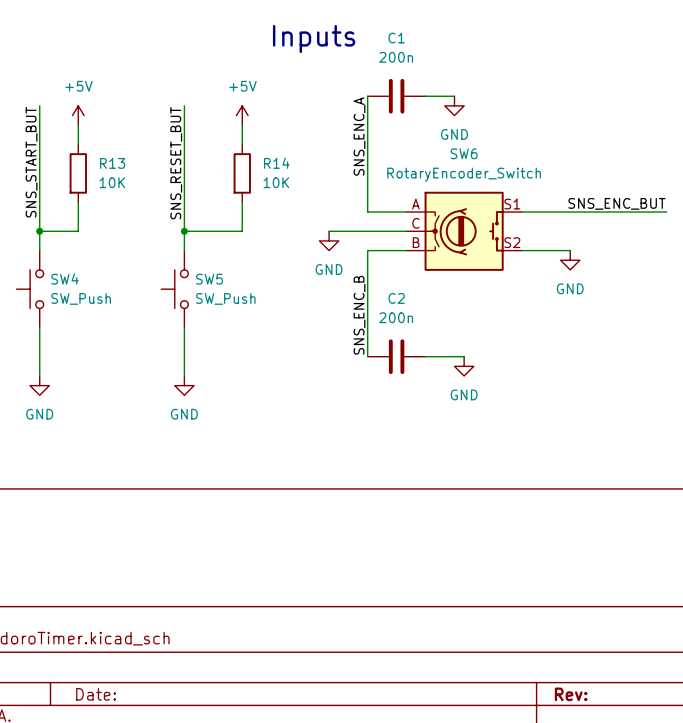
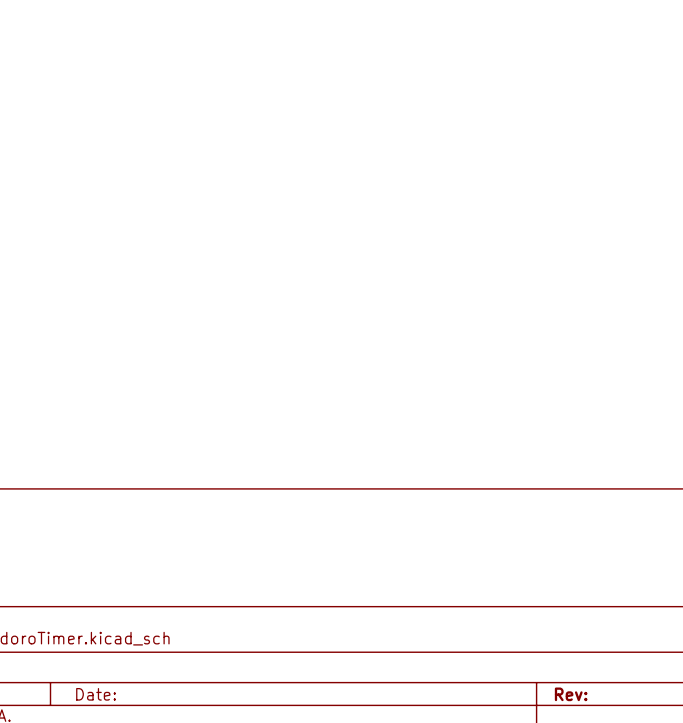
text: Inputs (314, 38) -> none
wire: (367, 96) (367, 212) (406, 212) -> none
C1: 200n (396, 96) -> none
wire: (425, 96) (454, 96) -> none
wire: (39, 105) (39, 250) -> none
wire: (184, 105) (184, 250) -> none
power symbol: GND (454, 105) -> none
power symbol: +5V (78, 115) -> none
power symbol: +5V (242, 115) -> none
wire: (78, 125) (78, 144) -> none
wire: (242, 125) (242, 144) -> none
label: SNS_ENC_A (359, 136) -> none
label: SNS_START_BUT (31, 162) -> none
label: SNS_RESET_BUT (176, 163) -> none
R13: 10K (78, 173) -> none
R14: 10K (242, 173) -> none
wire: (78, 202) (78, 231) (39, 231) -> none
wire: (242, 202) (242, 231) (184, 231) -> none
label: SNS_ENC_BUT (617, 203) -> none
wire: (522, 212) (666, 212) -> none
junction: (39, 231) -> none
junction: (184, 231) -> none
wire: (329, 231) (406, 231) -> none
SW6: RotaryEncoder_Switch (464, 231) -> none
power symbol: GND (329, 240) -> none
wire: (406, 250) (367, 250) (367, 356) -> none
wire: (522, 250) (570, 250) -> none
power symbol: GND (570, 260) -> none
SW4: SW_Push (30, 289) -> none
SW5: SW_Push (174, 289) -> none
label: SNS_ENC_B (359, 315) -> none
wire: (39, 327) (39, 375) -> none
wire: (184, 327) (184, 375) -> none
C2: 200n (396, 356) -> none
wire: (425, 356) (464, 356) -> none
power symbol: GND (464, 366) -> none
power symbol: GND (39, 385) -> none
power symbol: GND (184, 385) -> none

